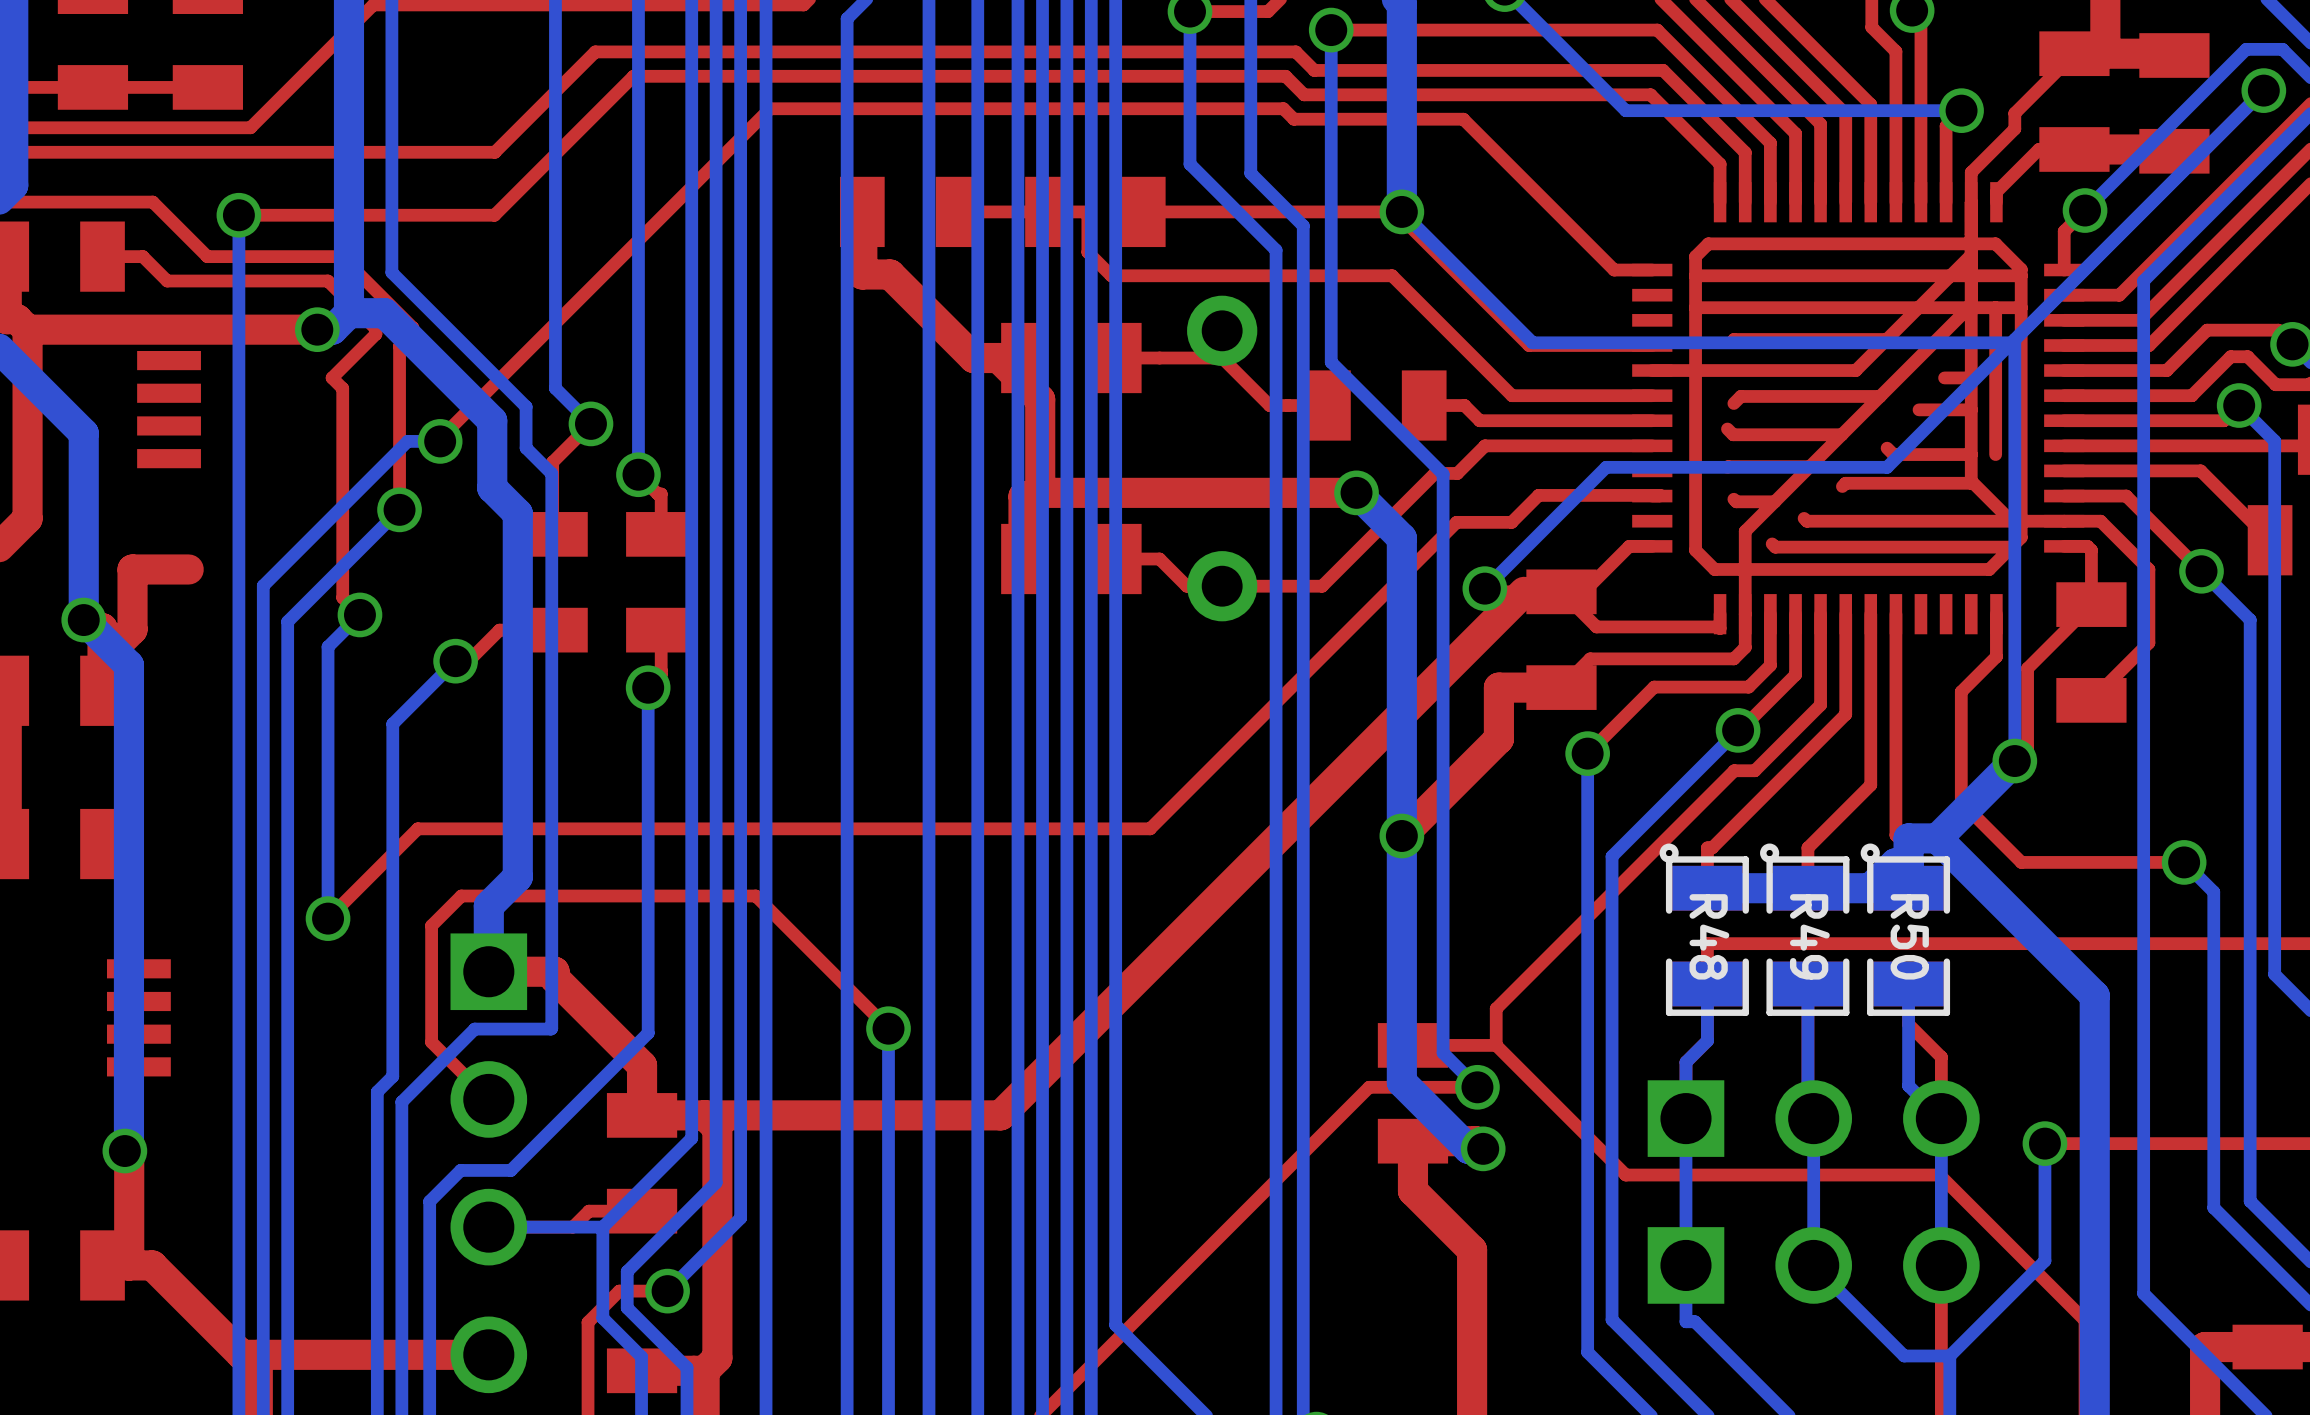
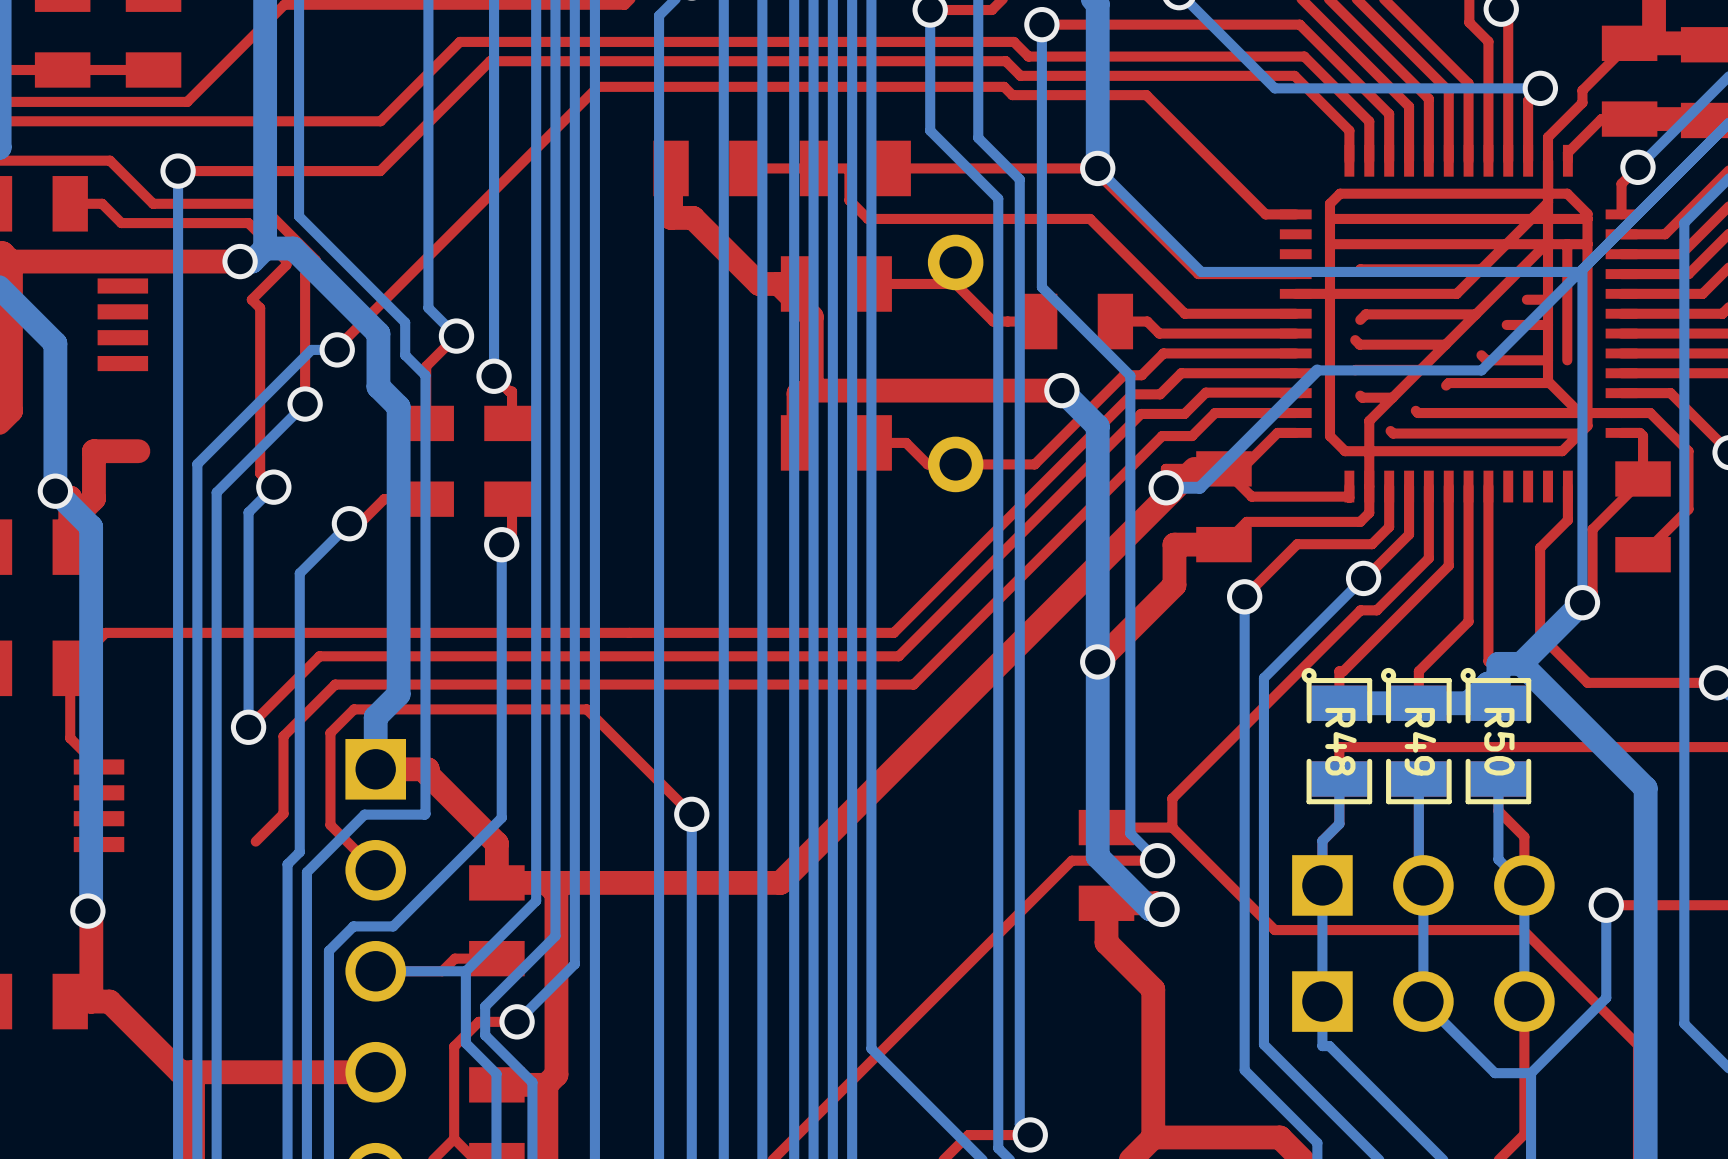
bottom track: (1679, 467) (1606, 467) (1484, 588) -> (1317, 370) (1199, 487) (1166, 487)
top track: none -> (1295, 373) (1181, 373) (1160, 394) (1132, 394) (893, 632) (105, 632) (70, 668) (70, 738) (99, 766)
top track: none -> (1295, 413) (1215, 413) (1192, 436) (1162, 436) (913, 684) (335, 684) (283, 736) (283, 813) (255, 841)
via position: (1484, 588) -> (1166, 487)

